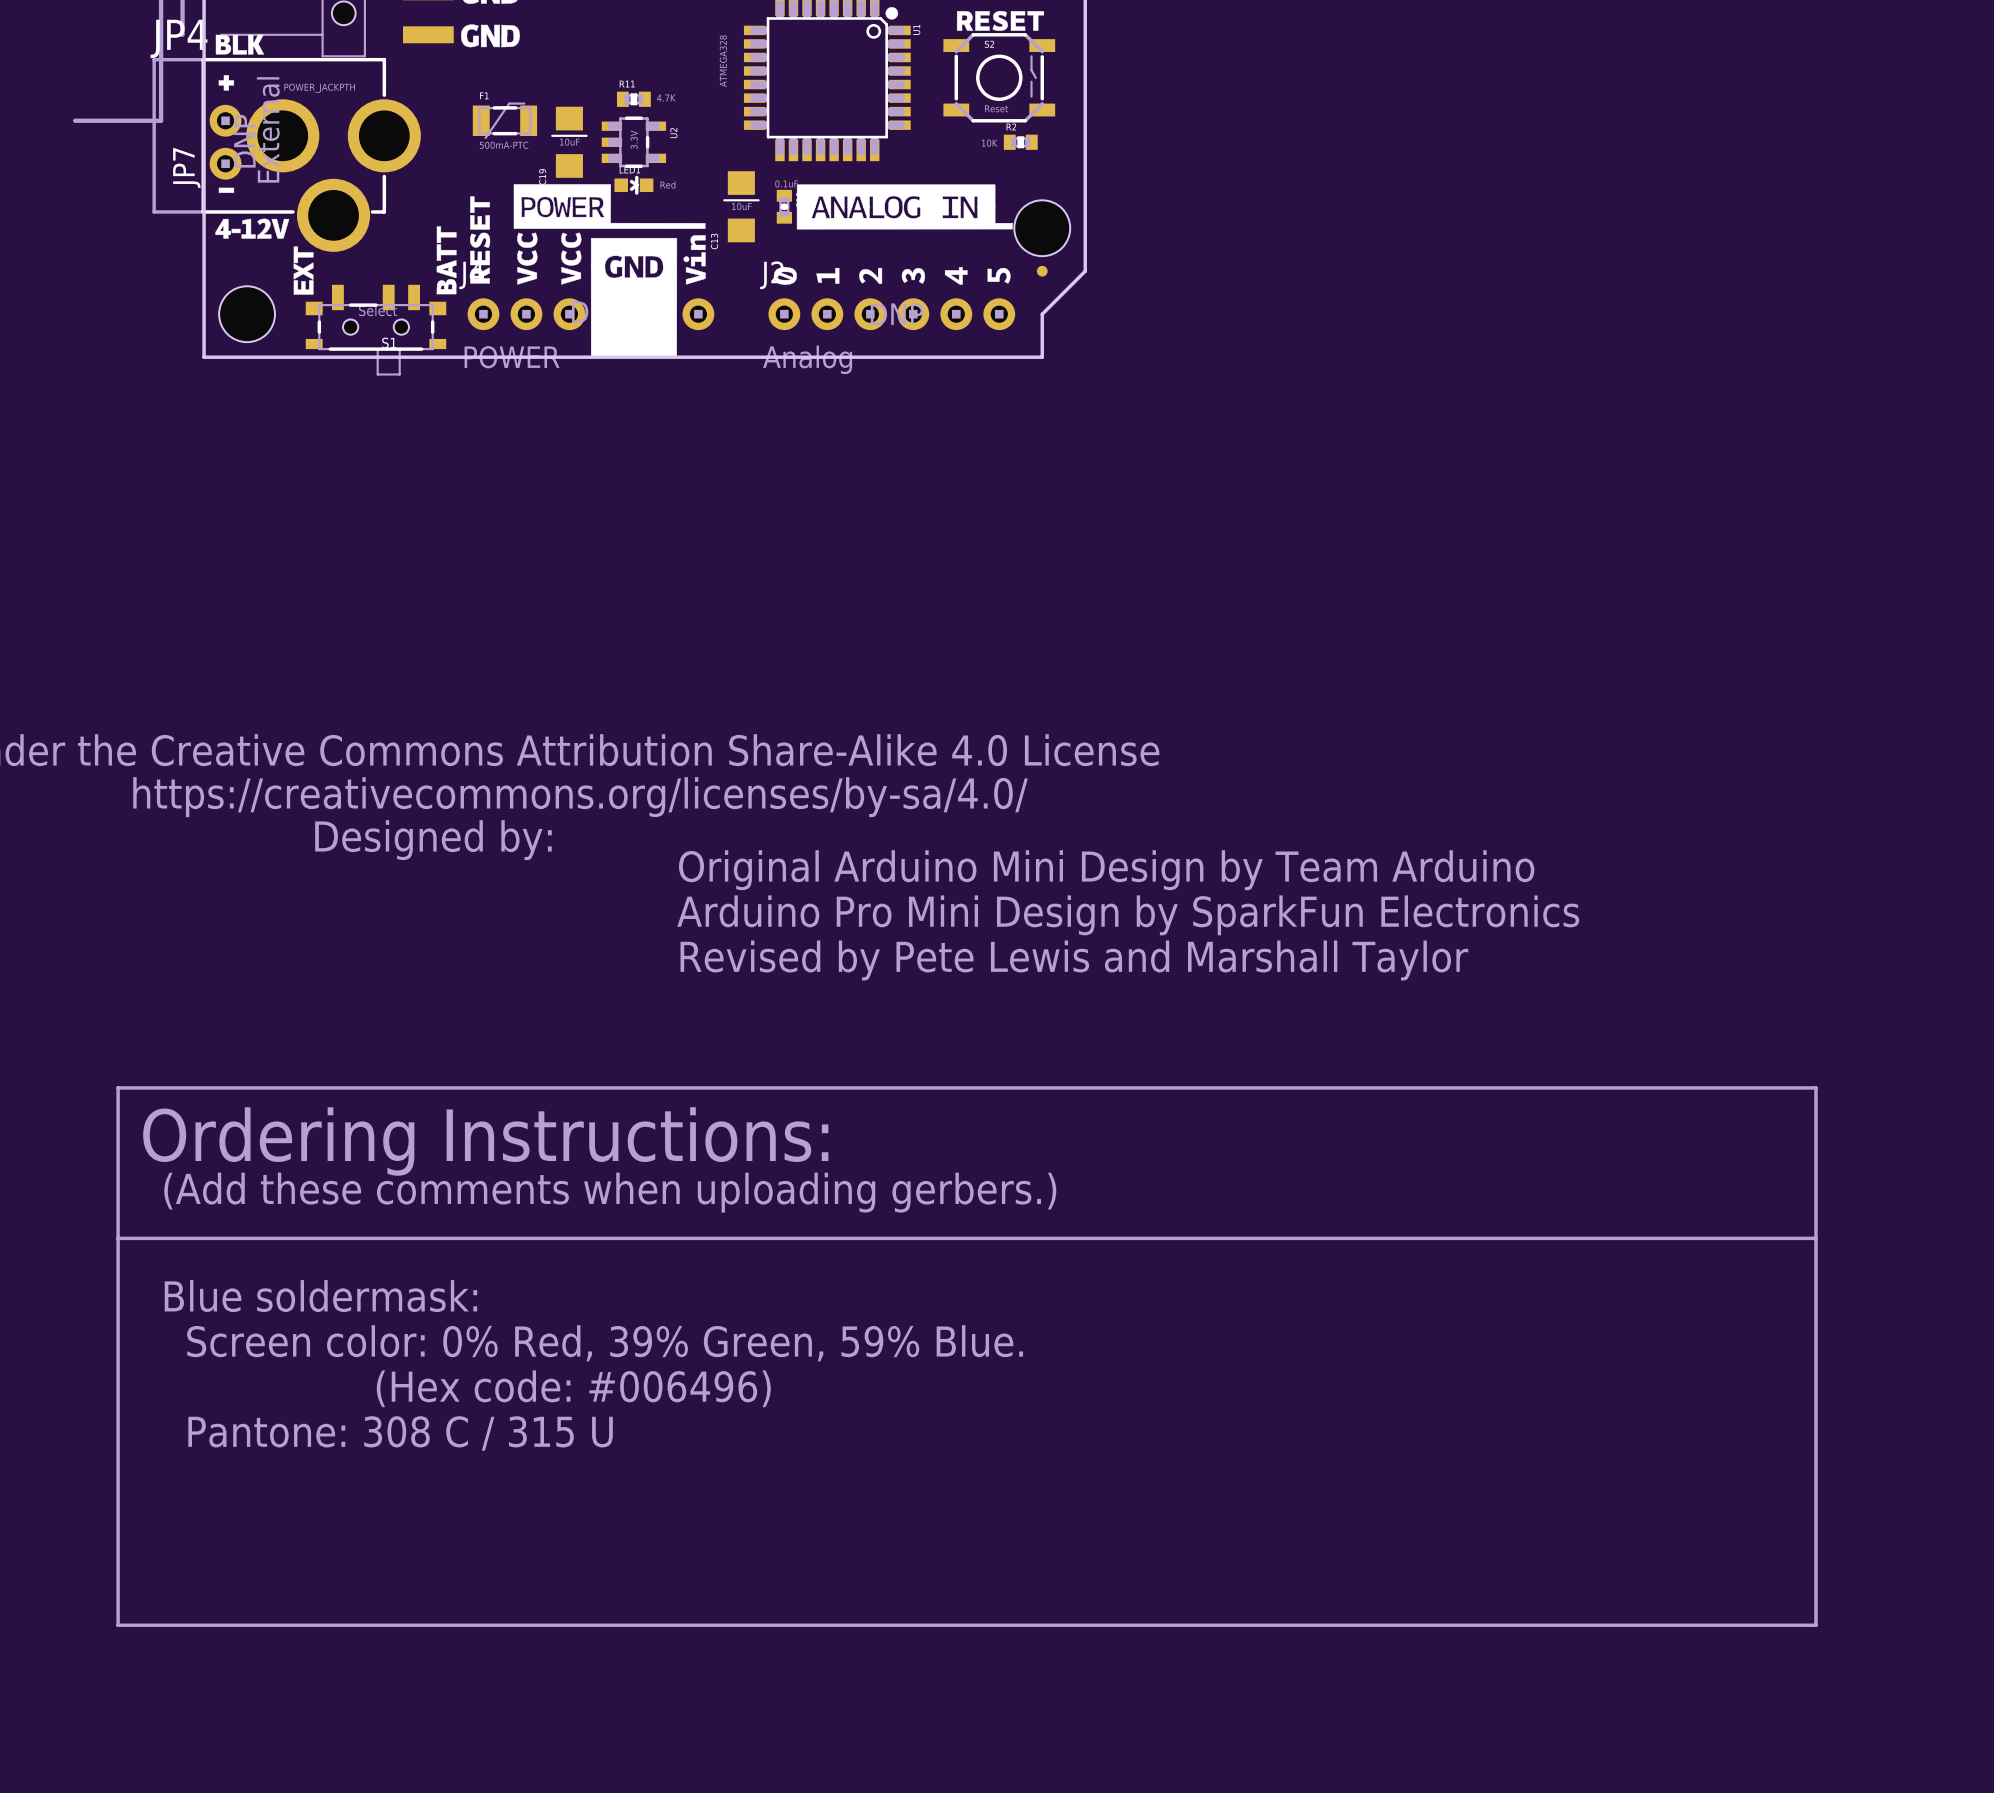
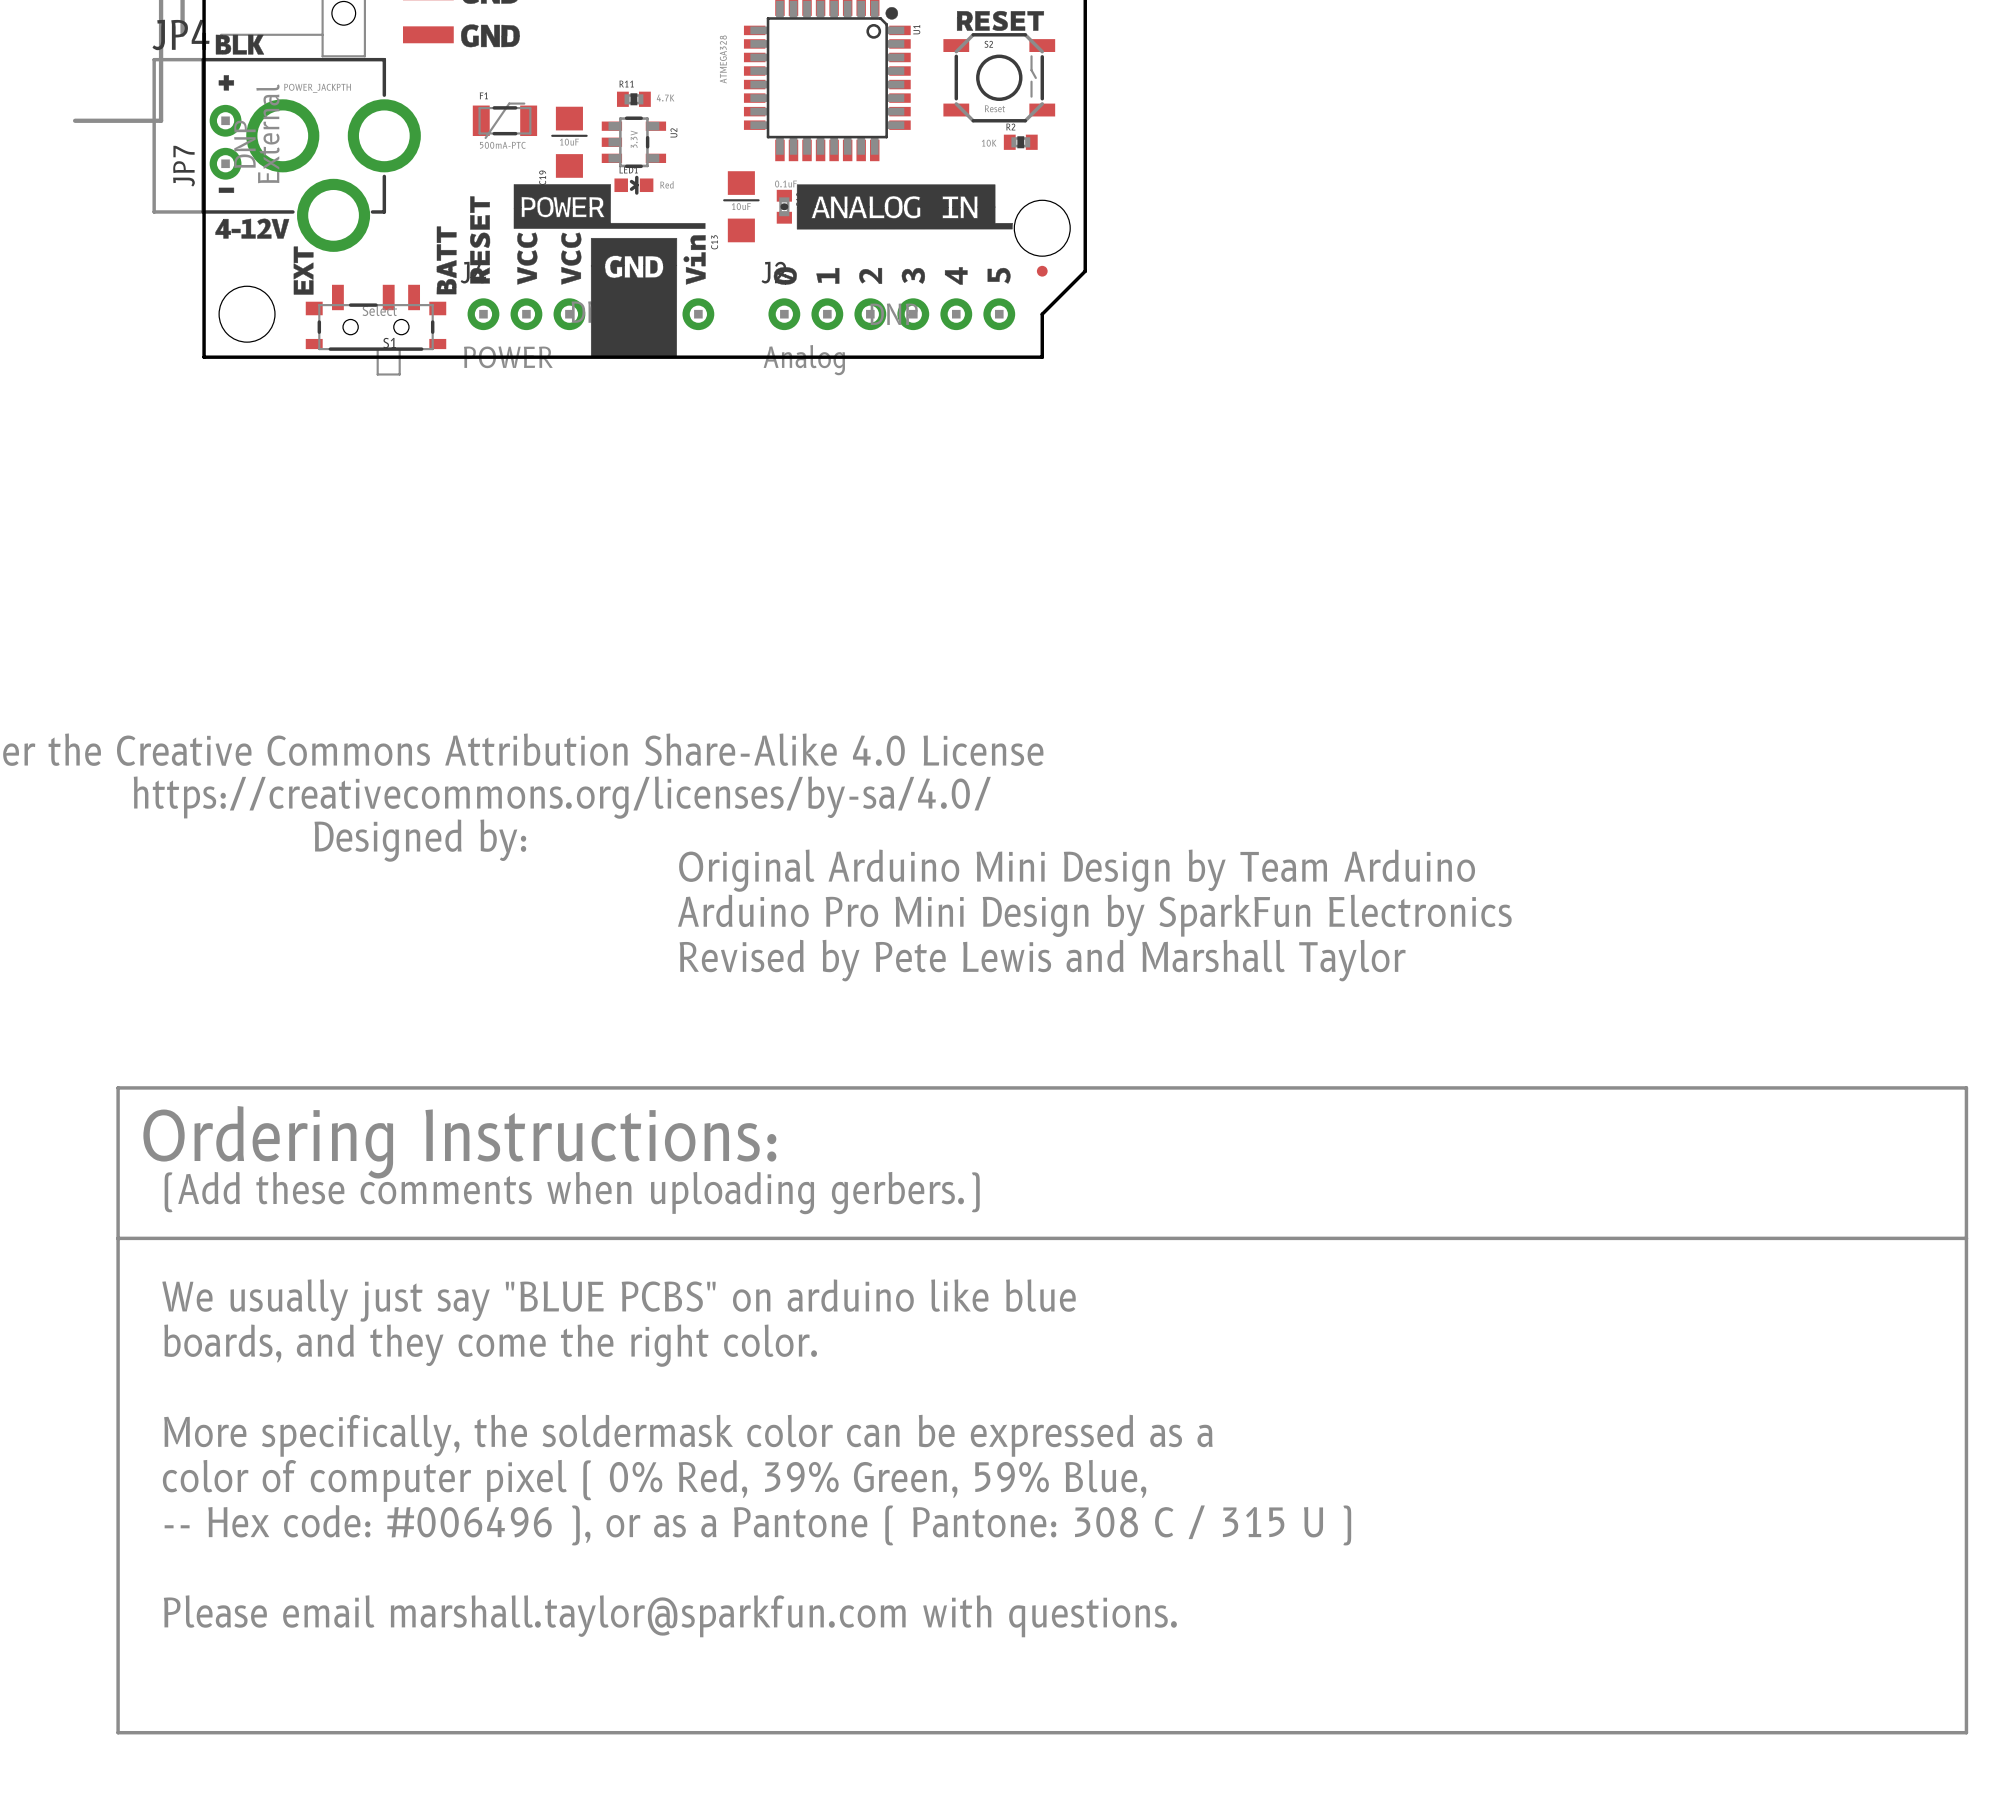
line: (1815, 1087) (1815, 1625) (118, 1625) -> (1815, 1087) (1966, 1087) (1966, 1732) (118, 1732) (118, 1625)
line: none -> (1815, 1238) (1966, 1238)
text: Blue soldermask: (320, 1296) -> We usually just say "BLUE PCBS" on arduino like blue (619, 1300)
text: Screen color: 0% Red, 39% Green, 59% Blue. (605, 1343) -> boards, and they come the right color. (490, 1345)
text: (Hex code: #006496) (573, 1388) -> none
text: Pantone: 308 C / 315 U (400, 1433) -> More specifically, the soldermask color can be expressed as a (688, 1435)
text: none -> color of computer pixel ( 0% Red, 39% Green, 59% Blue, (654, 1480)
text: none -> -- Hex code: #006496 ), or as a Pantone ( Pantone: 308 C / 315 U ) (757, 1525)
text: none -> Please email marshall.taylor@sparkfun.com with questions. (670, 1616)

